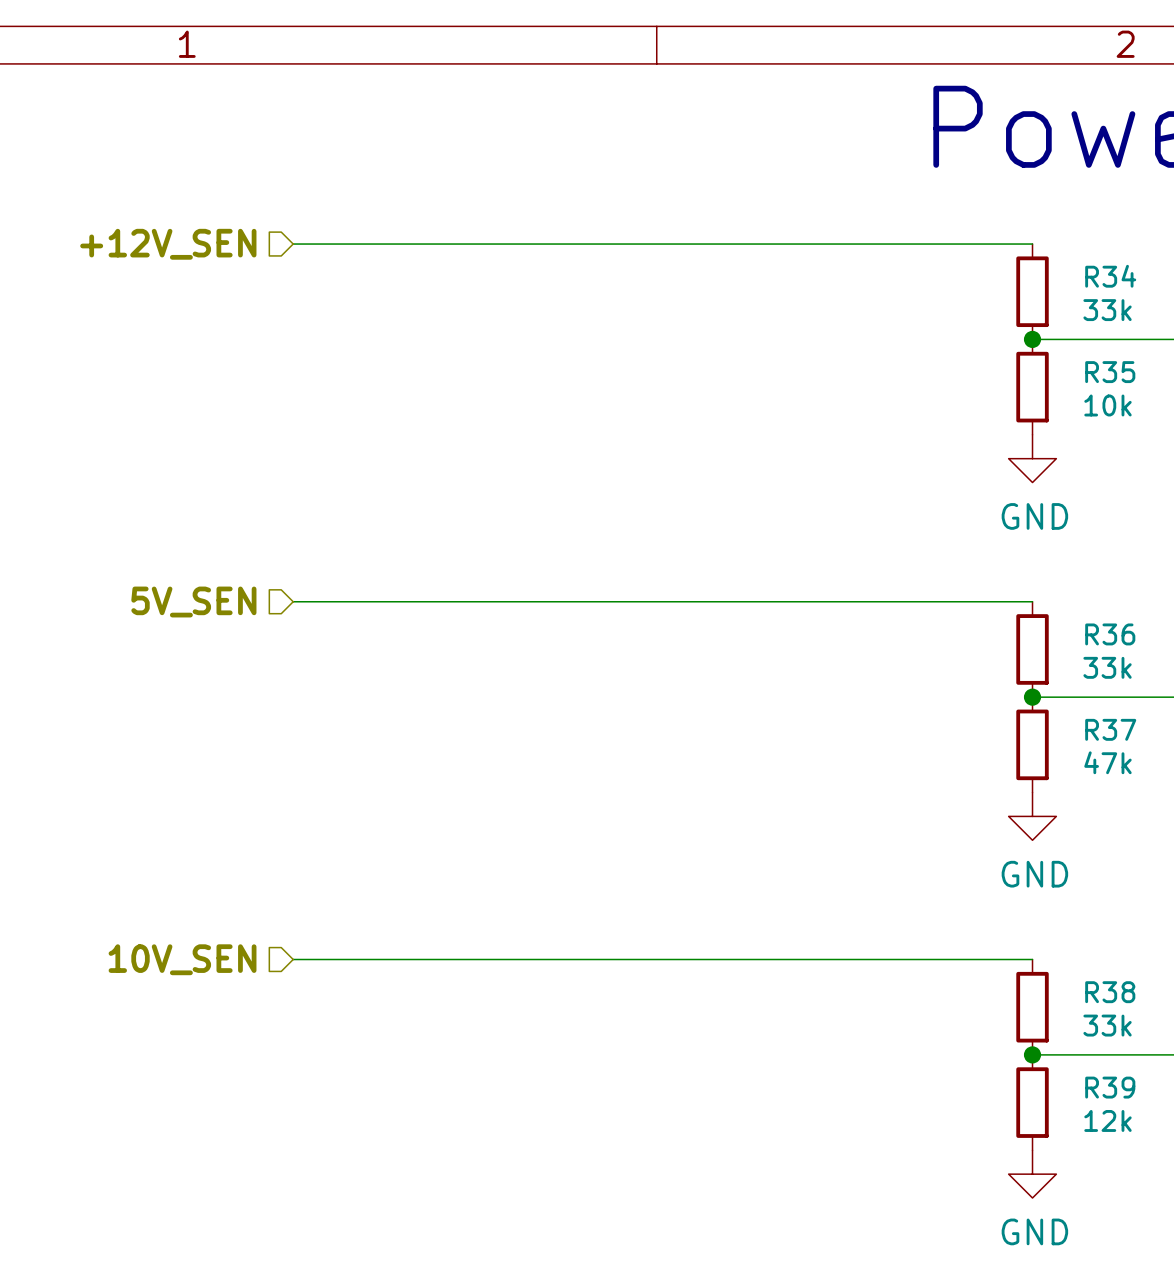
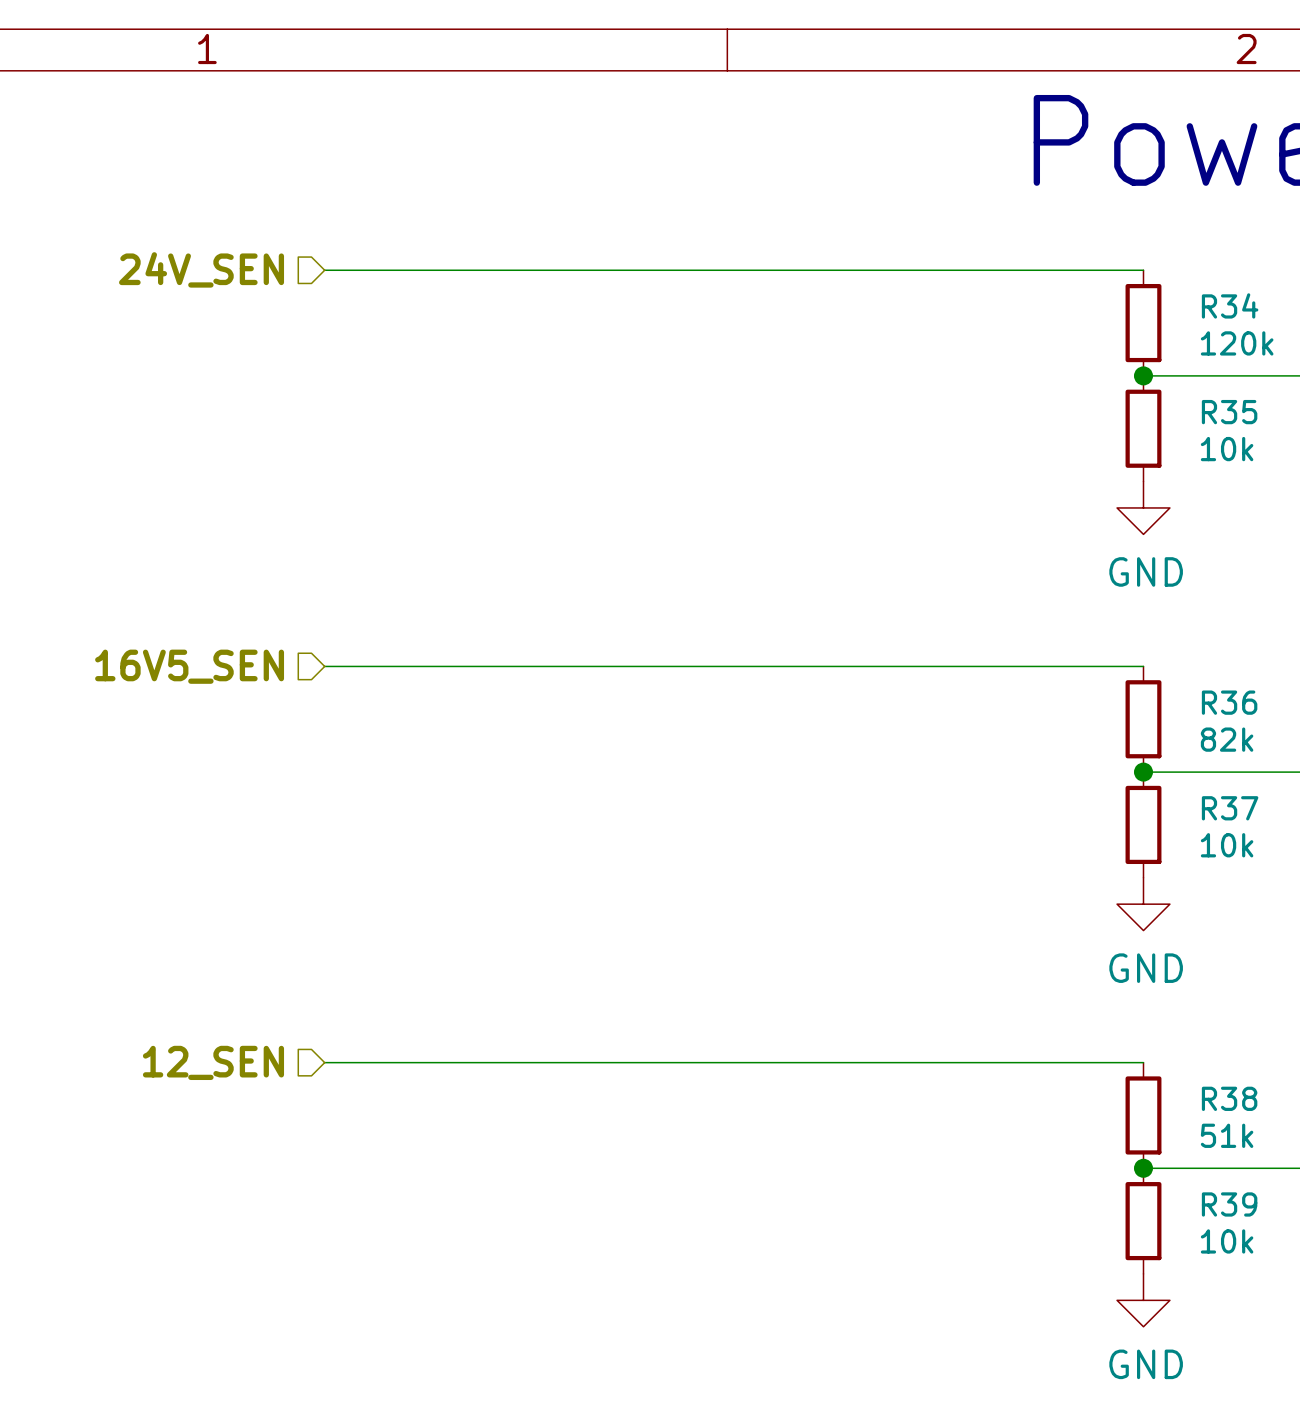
hierarchical label: +12V_SEN (168, 244) -> 24V_SEN (201, 269)
R34 value: 33k (1107, 310) -> 120k (1237, 343)
hierarchical label: 5V_SEN (193, 602) -> 16V5_SEN (189, 666)
R36 value: 33k (1107, 667) -> 82k (1227, 739)
R37 value: 47k (1107, 762) -> 10k (1227, 845)
hierarchical label: 10V_SEN (182, 959) -> 12_SEN (213, 1062)
R38 value: 33k (1107, 1025) -> 51k (1227, 1135)
R39 value: 12k (1107, 1120) -> 10k (1227, 1241)

